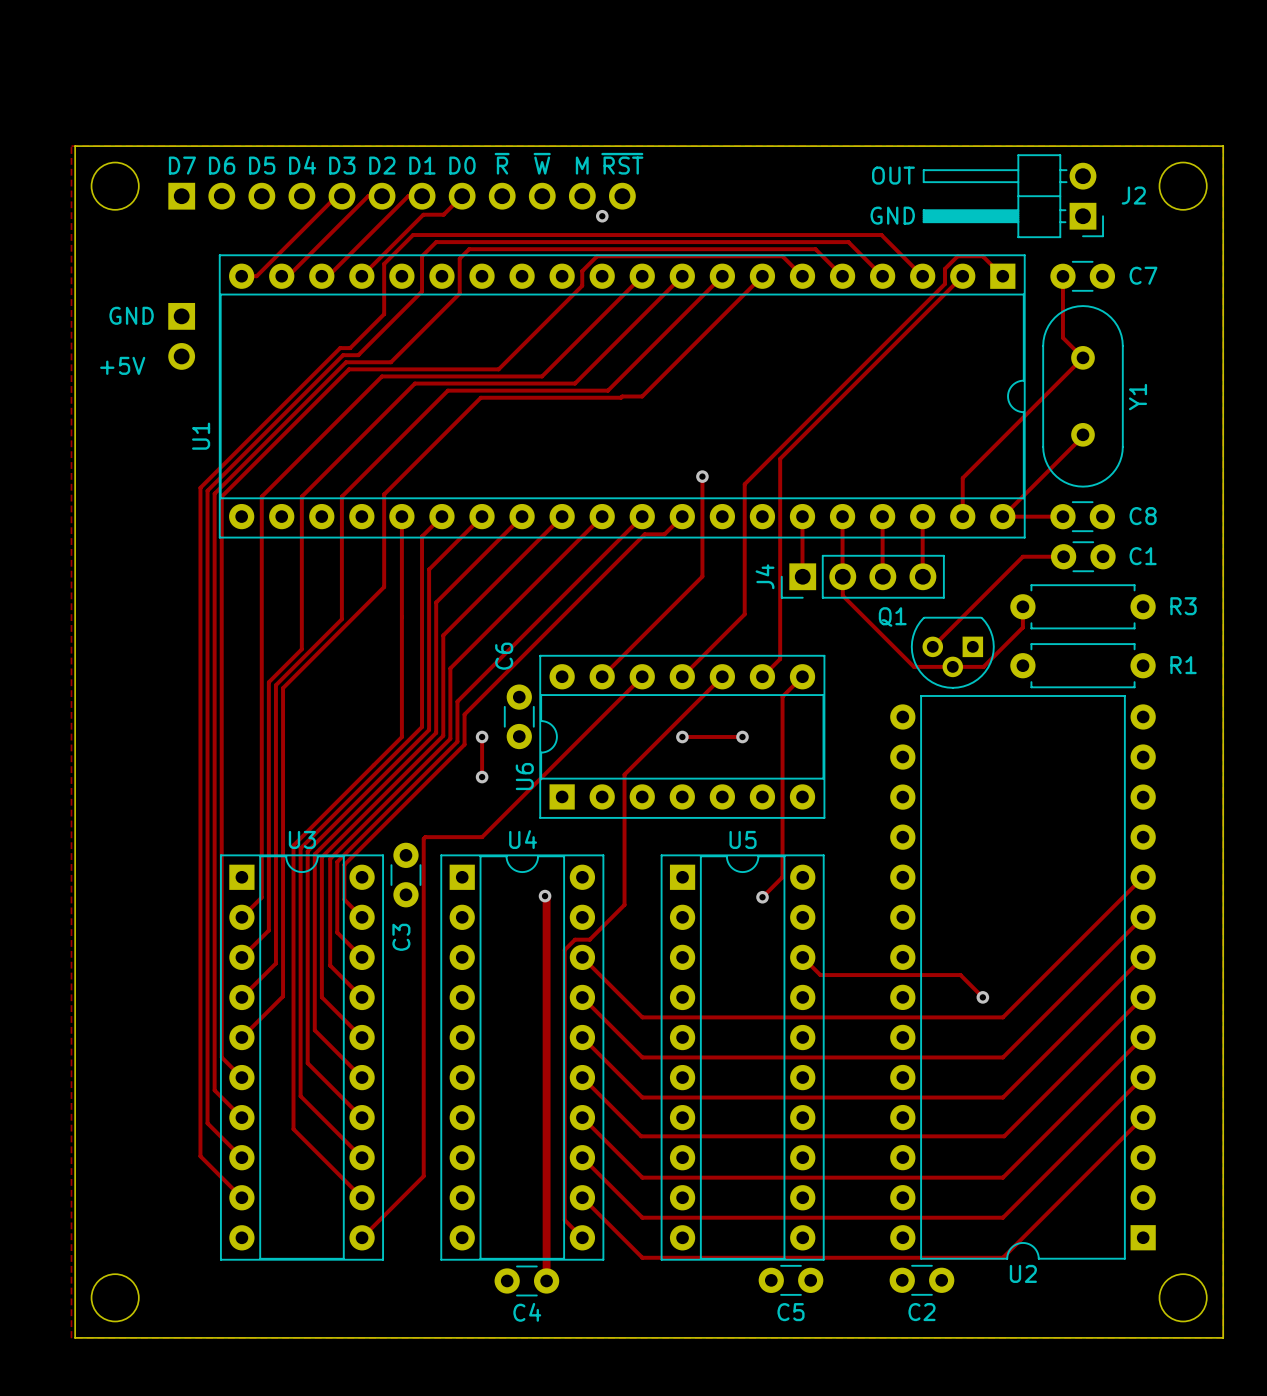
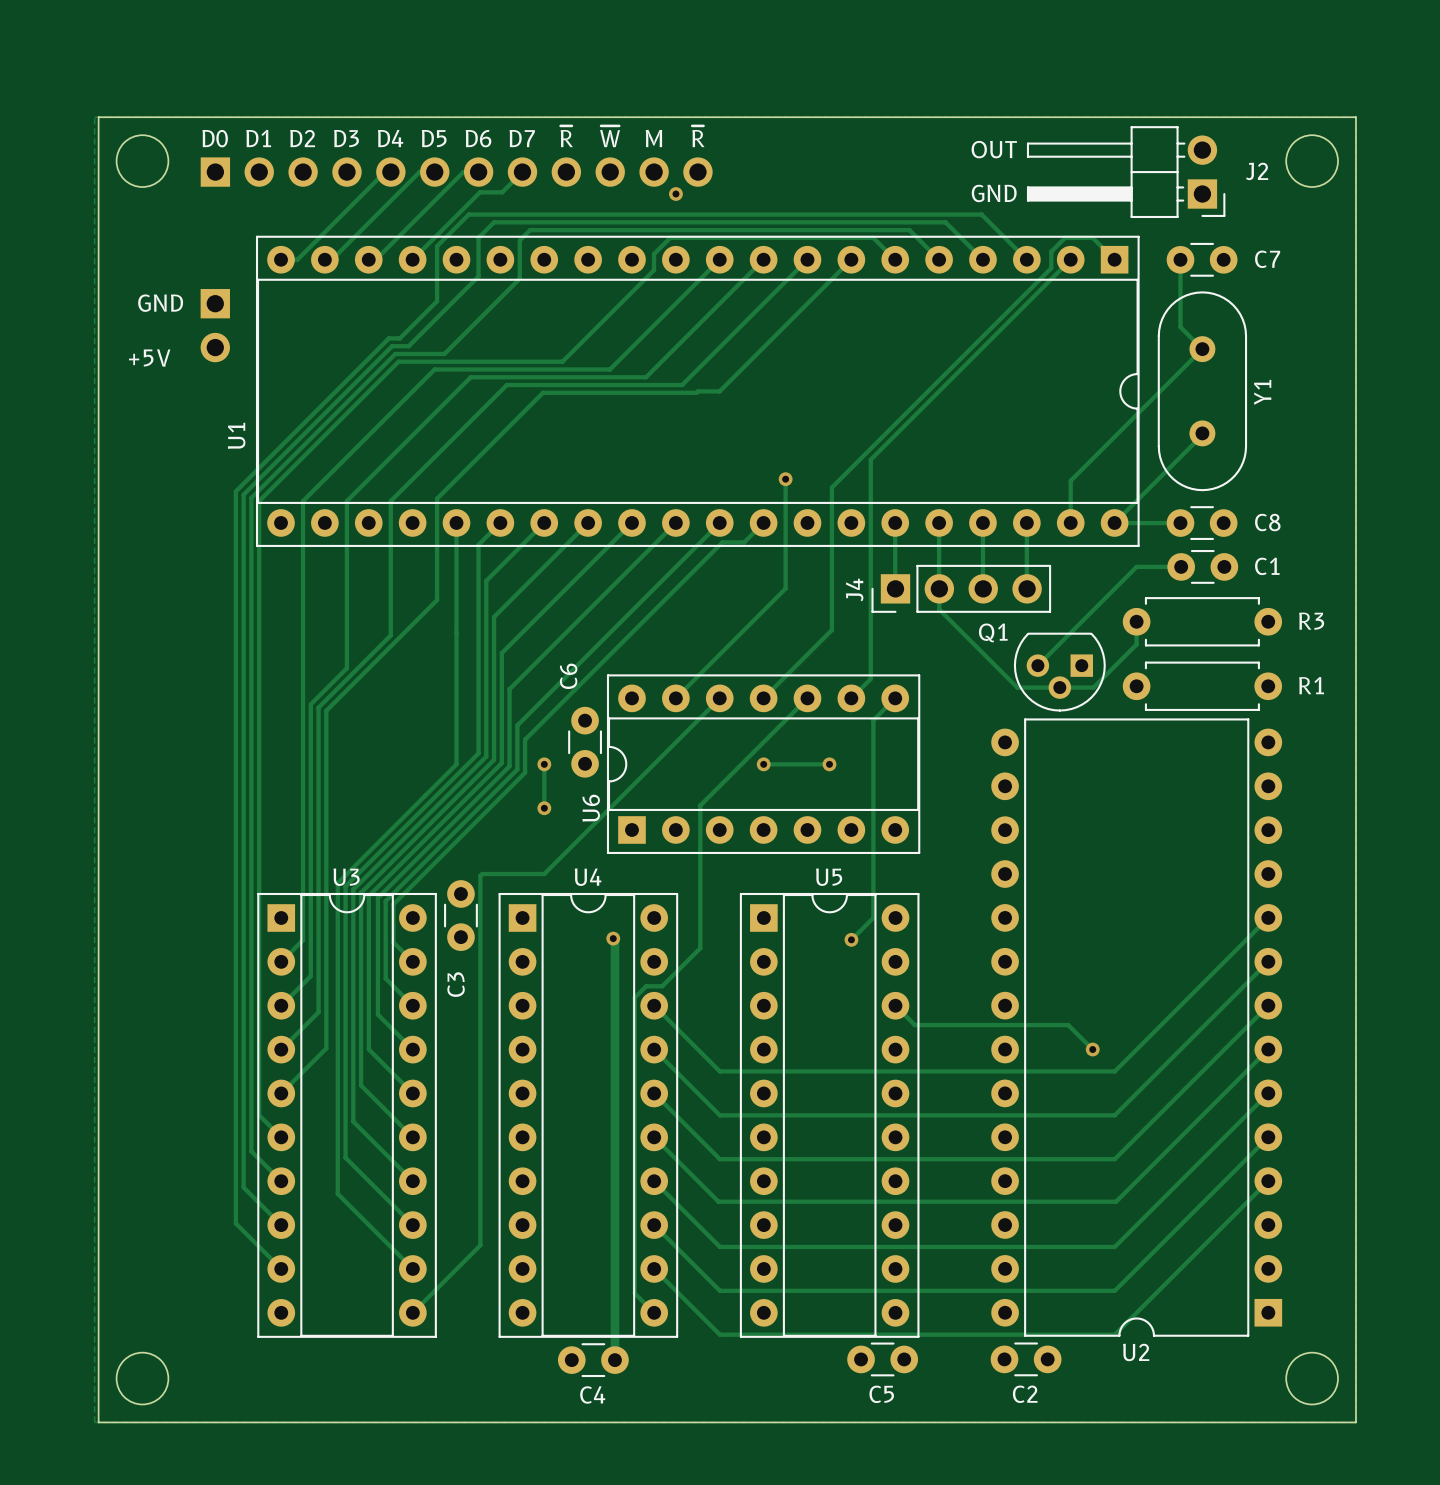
text: ~{RST} (622, 163) -> ~{R} (698, 136)
text: D7 (182, 165) -> D0 (215, 138)
text: D6 (222, 165) -> D1 (258, 138)
text: D5 (262, 165) -> D2 (302, 138)
text: D4 (302, 165) -> D3 (346, 138)
text: D3 (342, 165) -> D4 (390, 138)
text: D2 (382, 165) -> D5 (434, 138)
text: D1 (422, 165) -> D6 (478, 138)
text: D0 (462, 165) -> D7 (522, 138)

